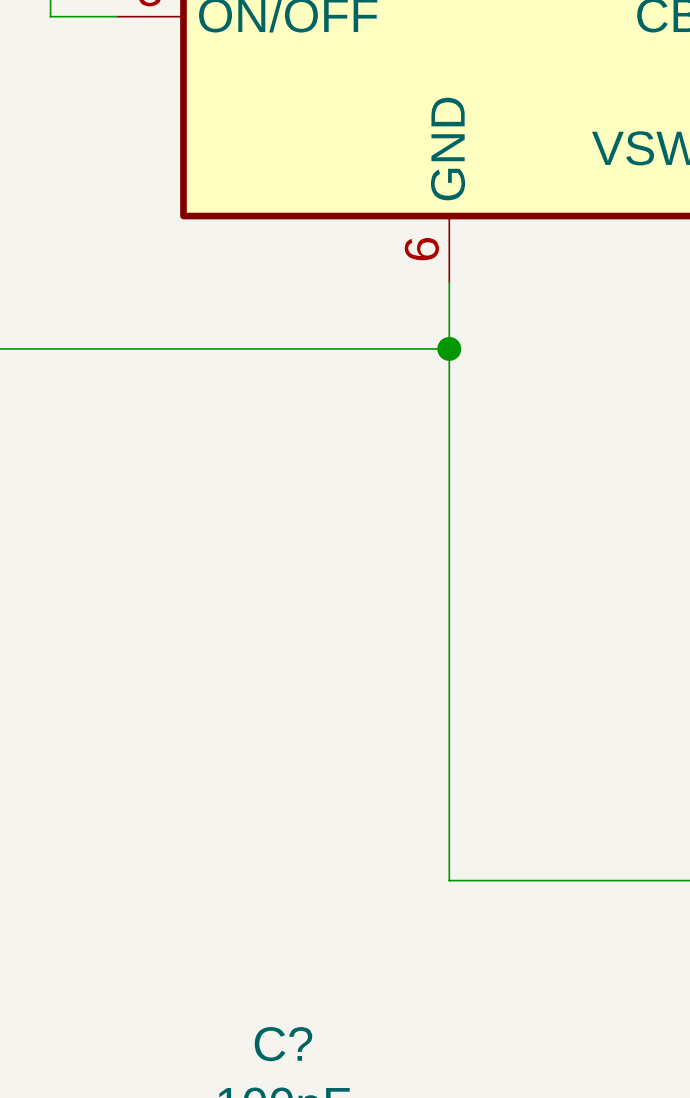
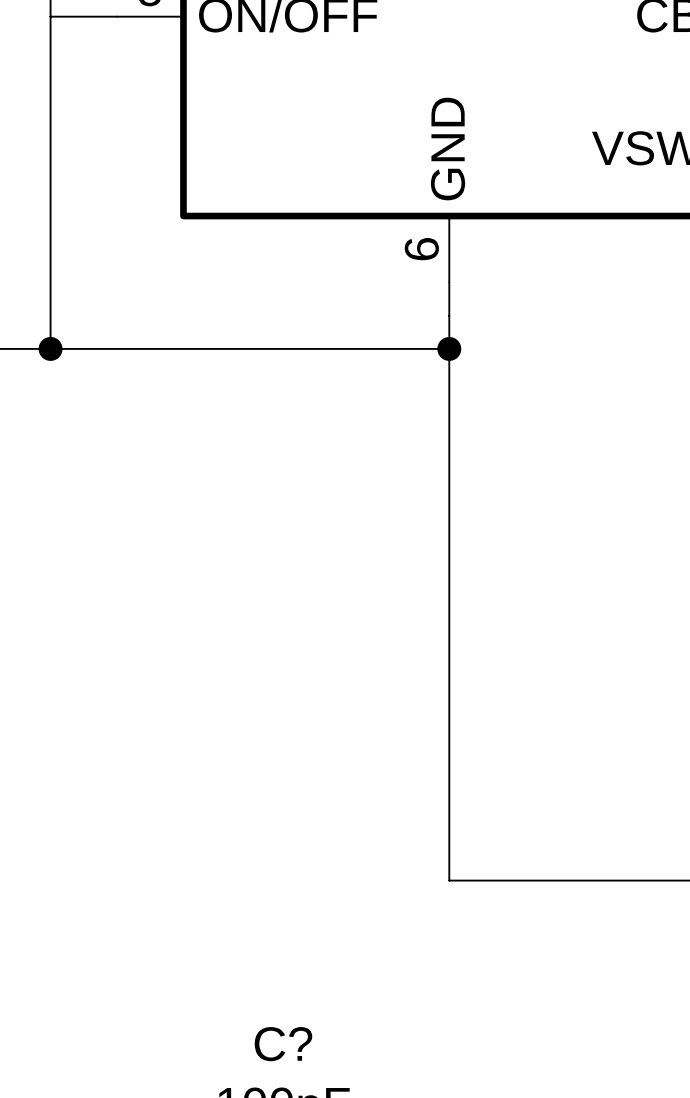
wire: none -> (50, 16) (50, 348)
junction: none -> (50, 348)

